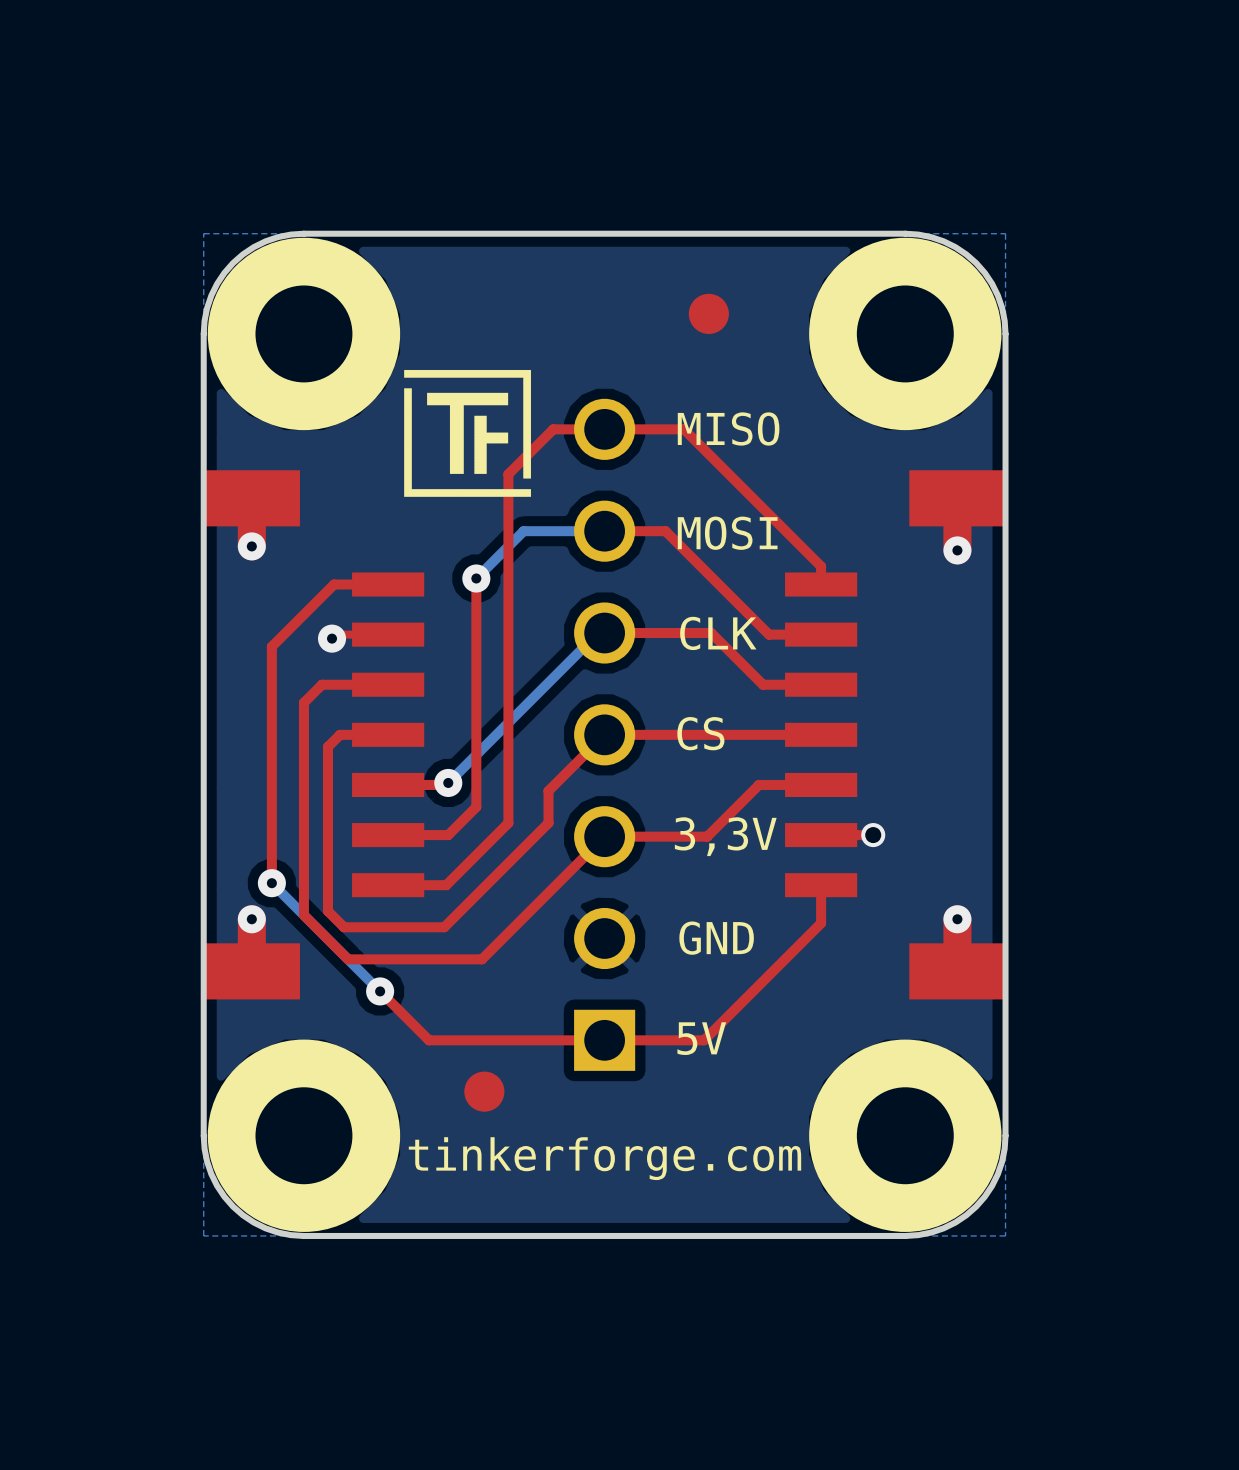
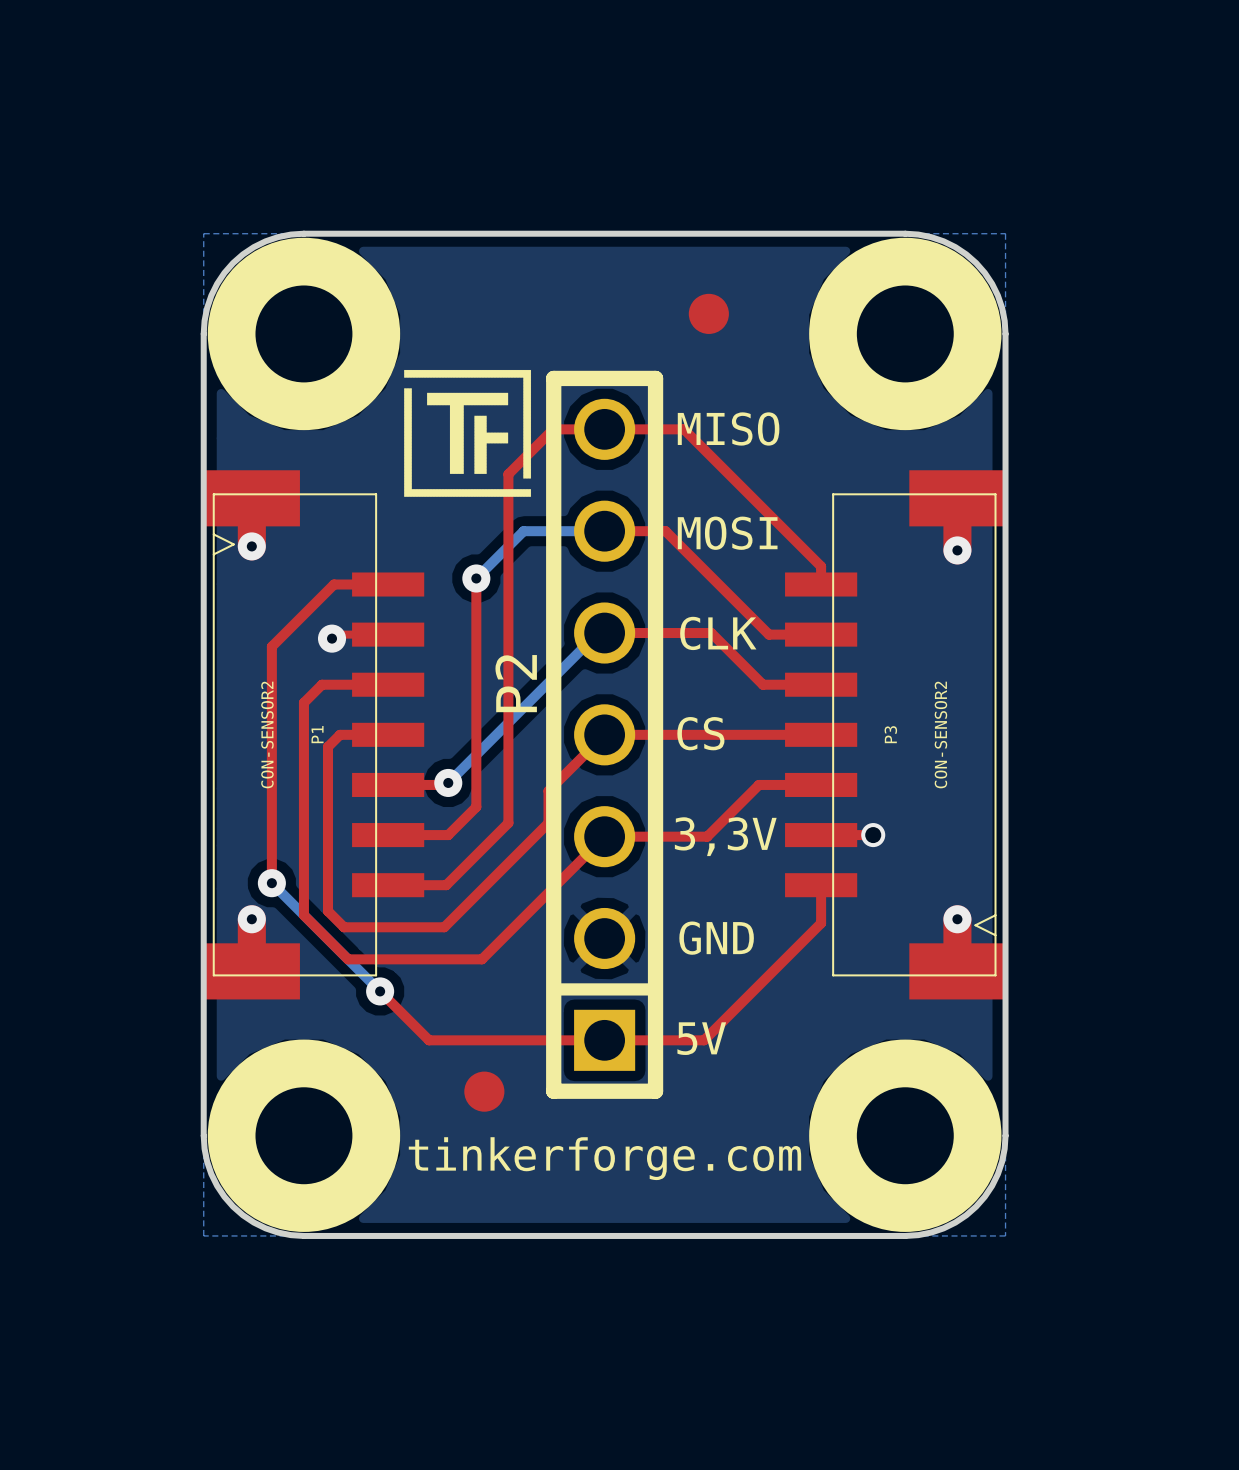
part: (313, 734) -> none
P1: none -> CON-SENSOR2 (313, 734)
P2: none -> (604, 734)
part: (895, 734) -> none
P3: none -> CON-SENSOR2 (895, 734)

